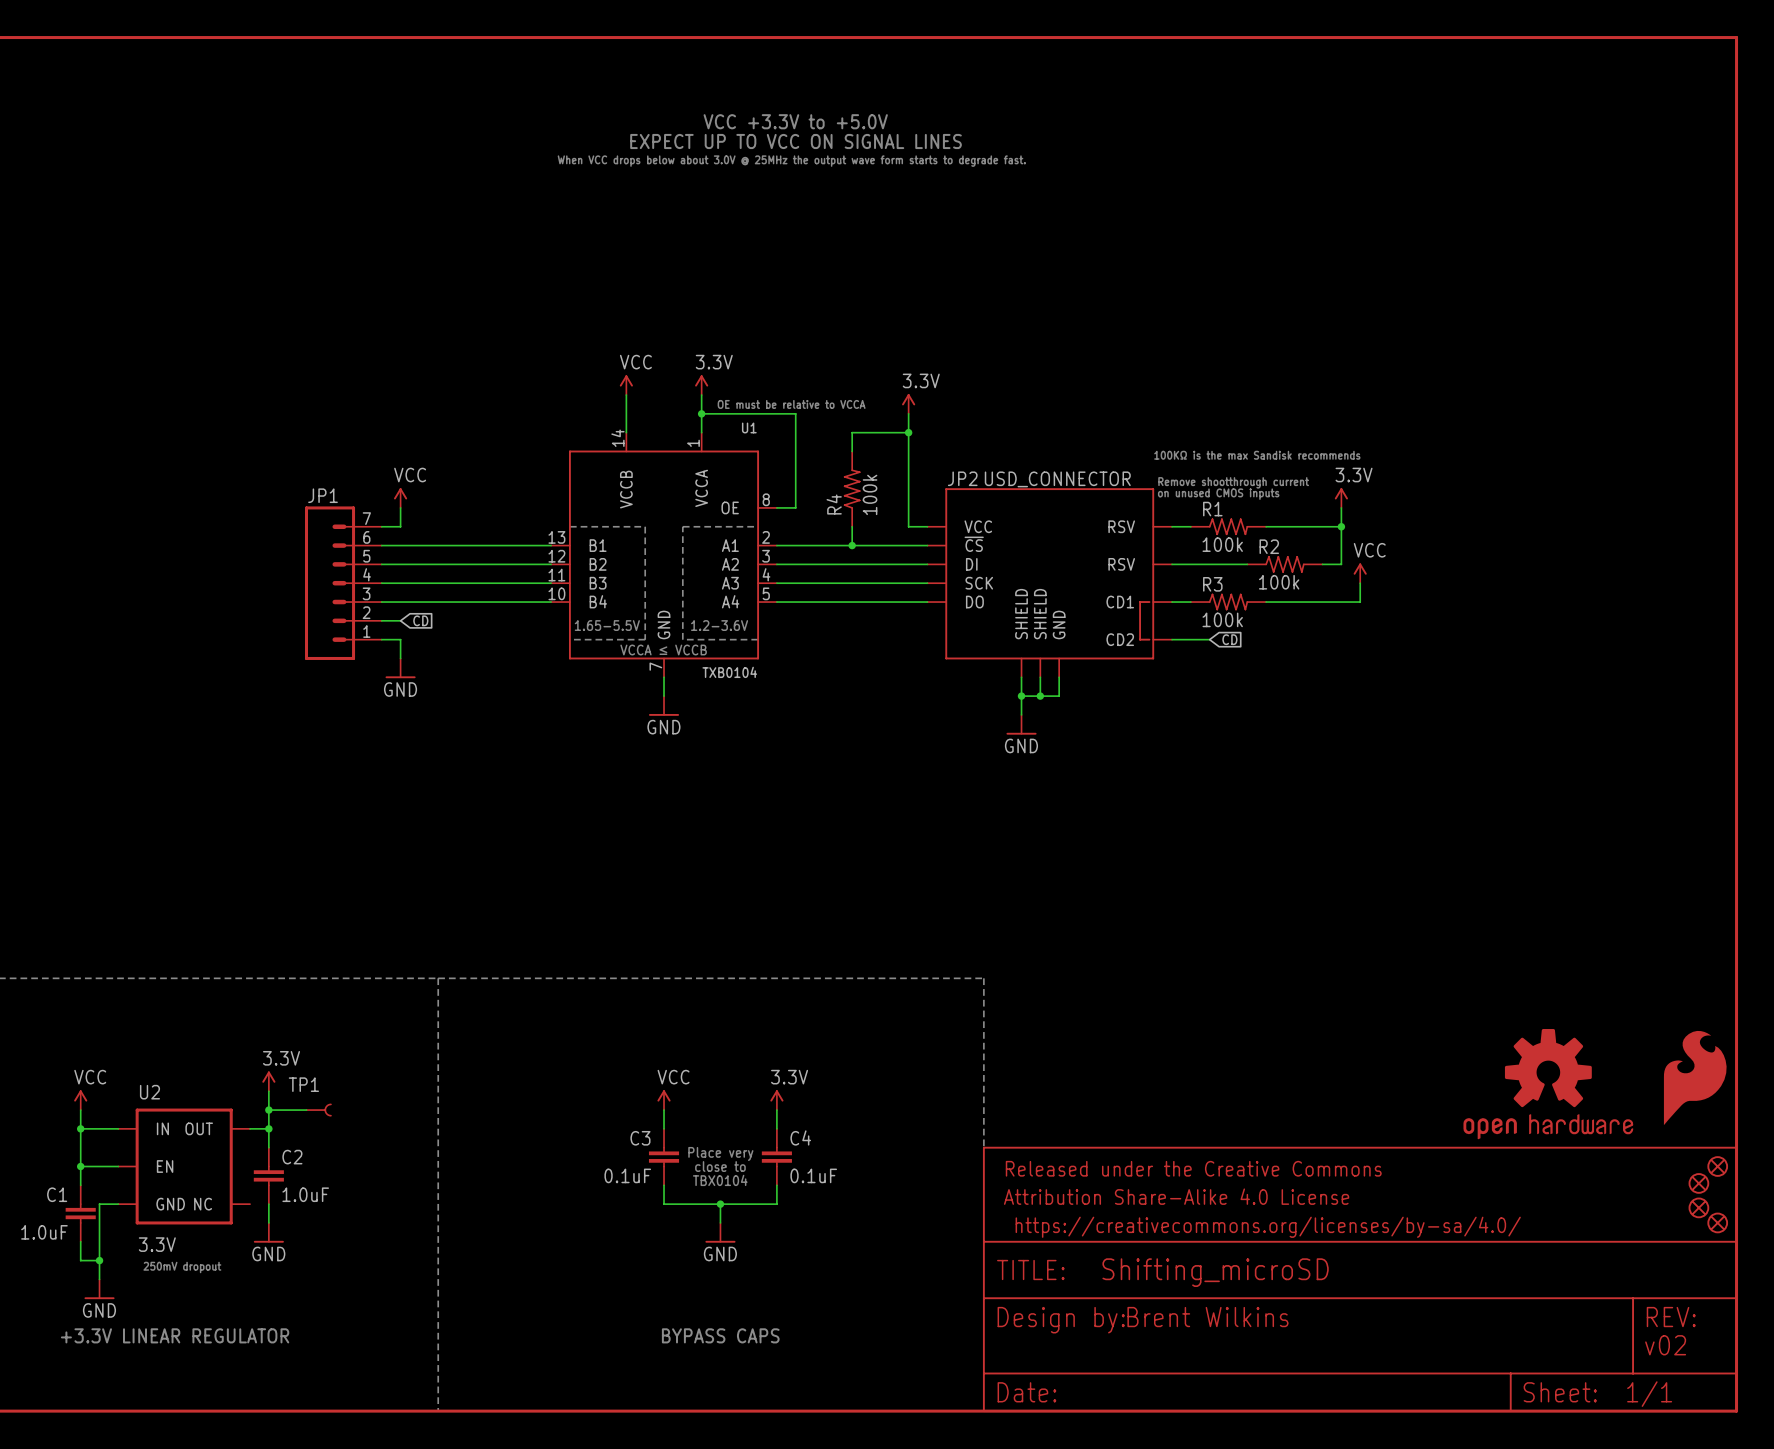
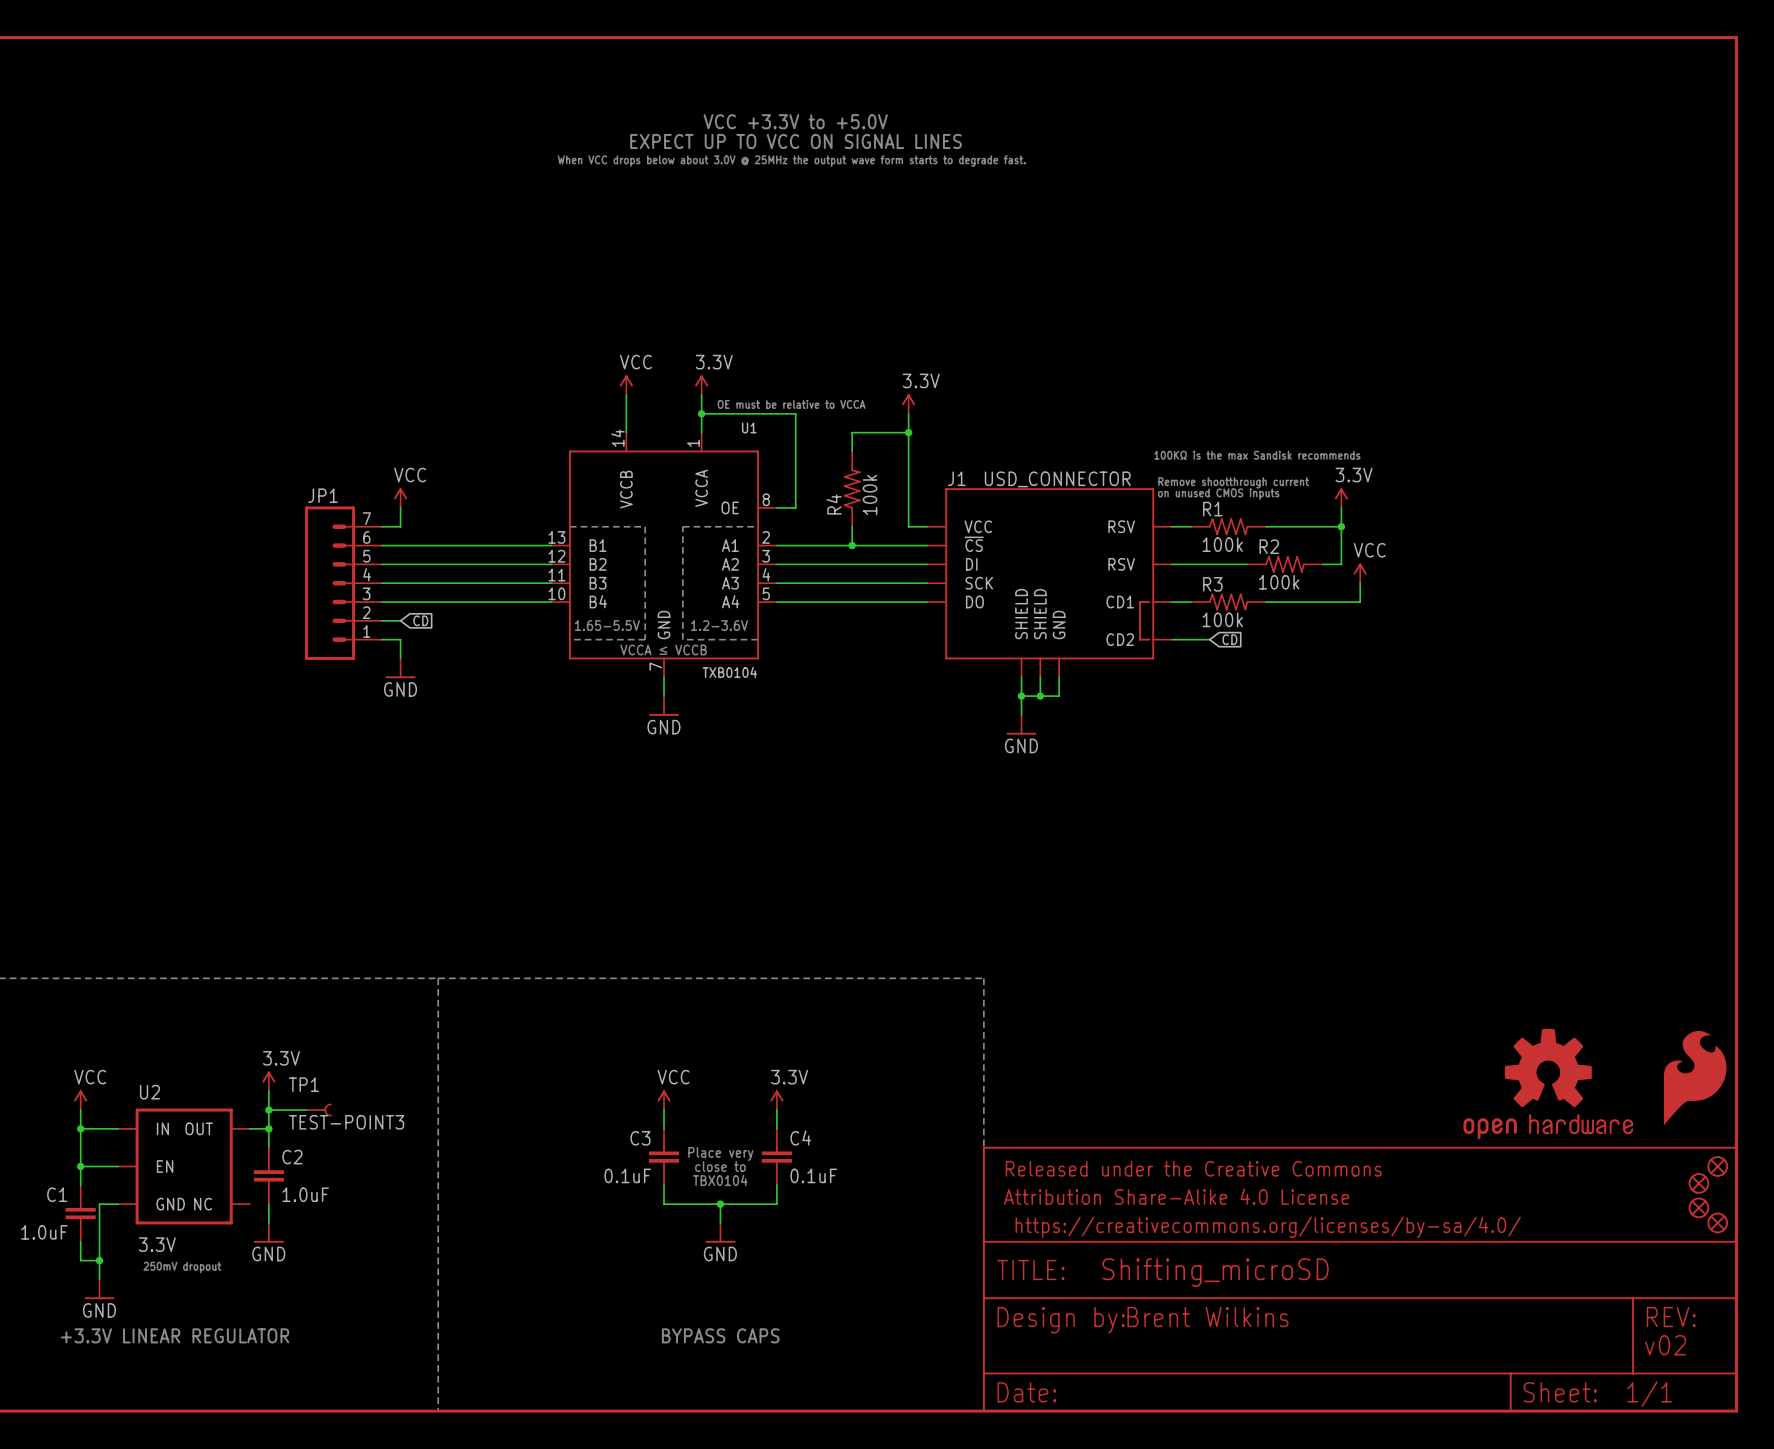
JP2 name: JP2 (962, 478) -> J1 (956, 478)
TP1 value: none -> TEST-POINT3 (346, 1122)

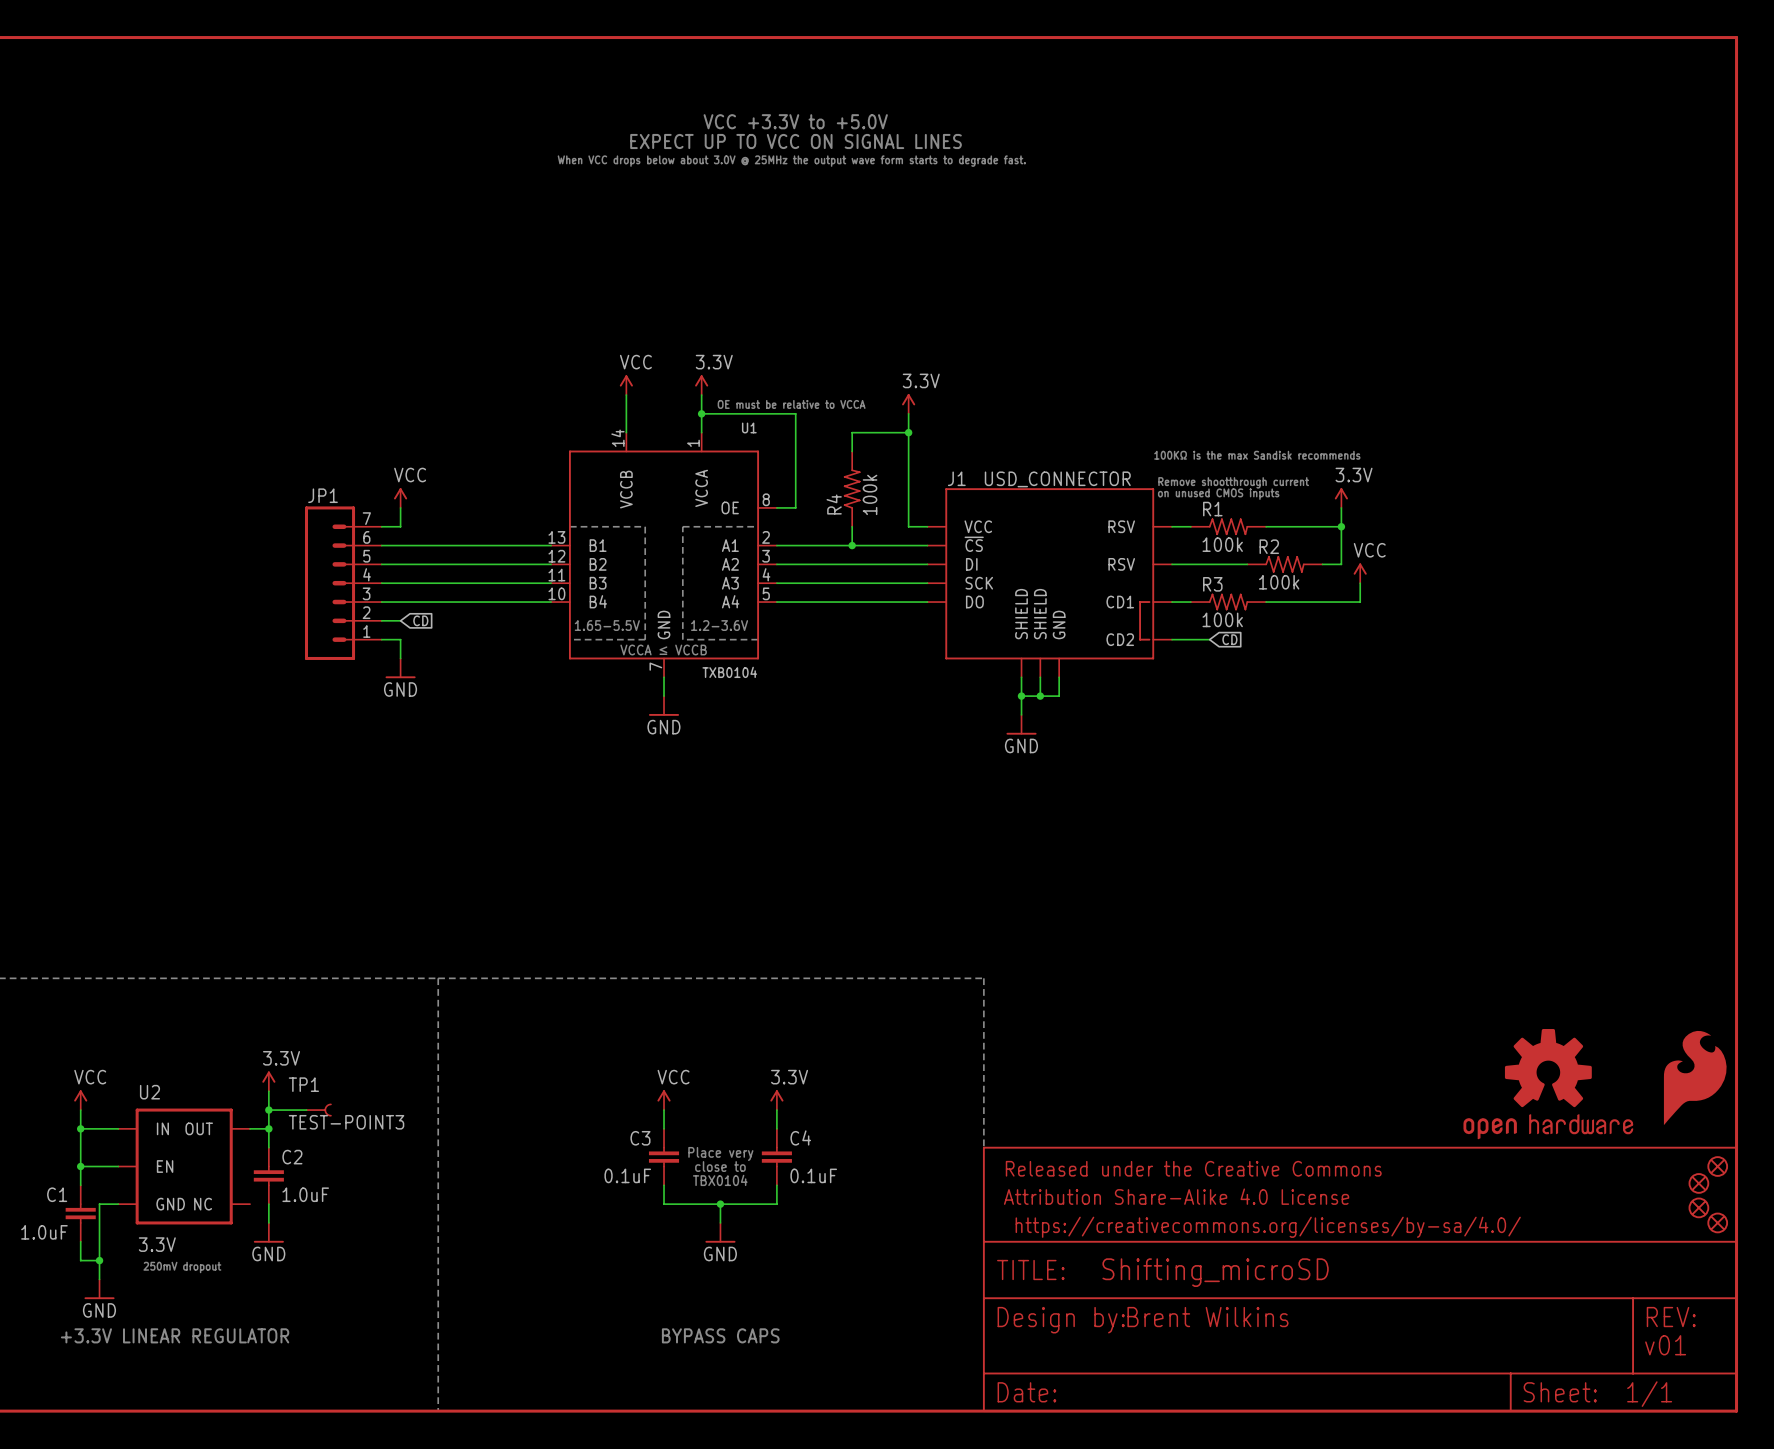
text: v02 (1665, 1345) -> v01 (1665, 1345)

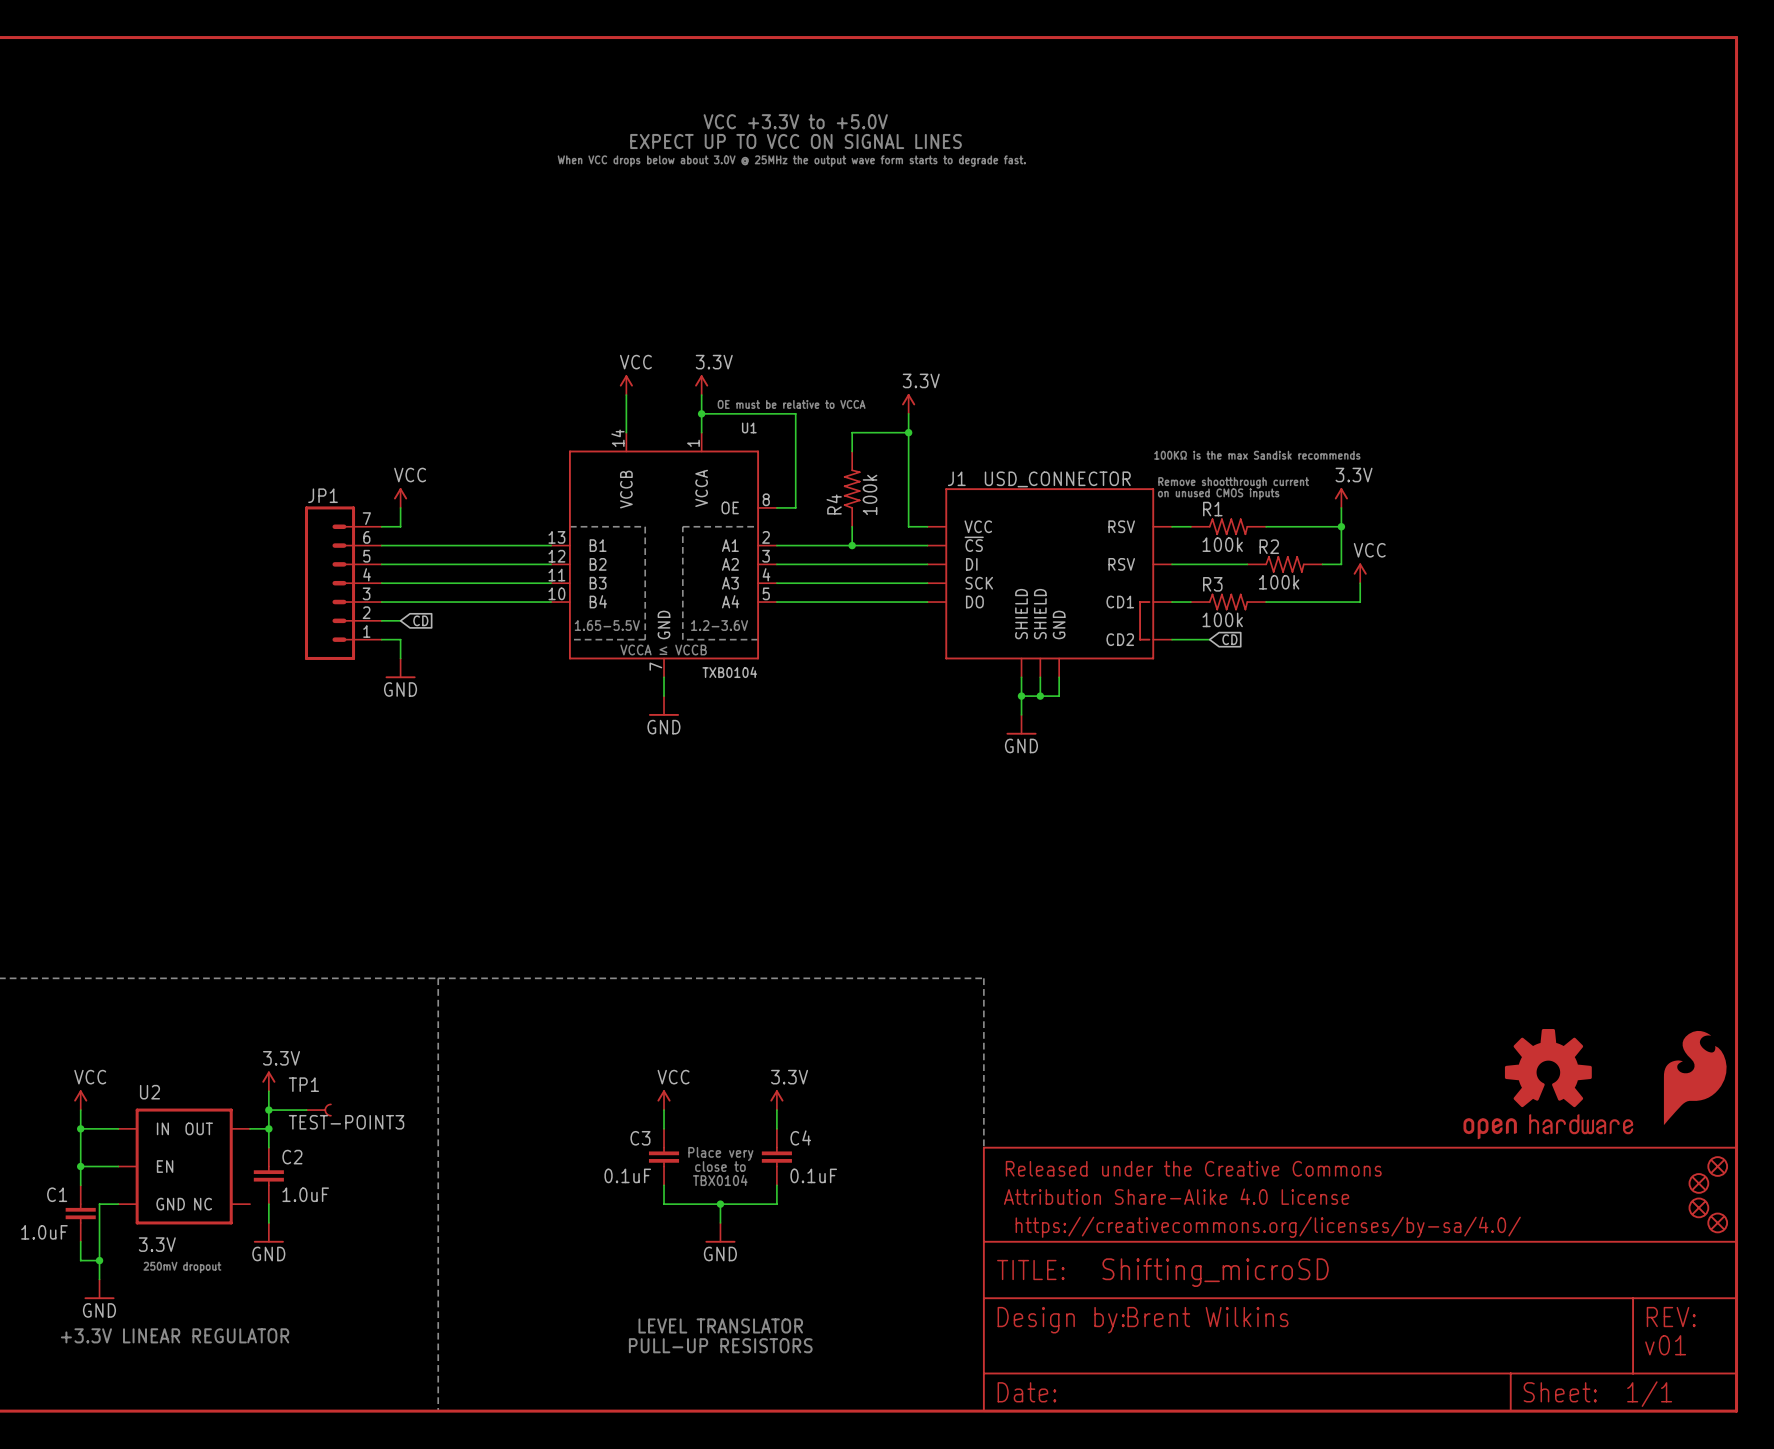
text: none -> LEVEL TRANSLATOR (720, 1325)
text: BYPASS CAPS (720, 1335) -> none
text: none -> PULL-UP RESISTORS (720, 1345)

